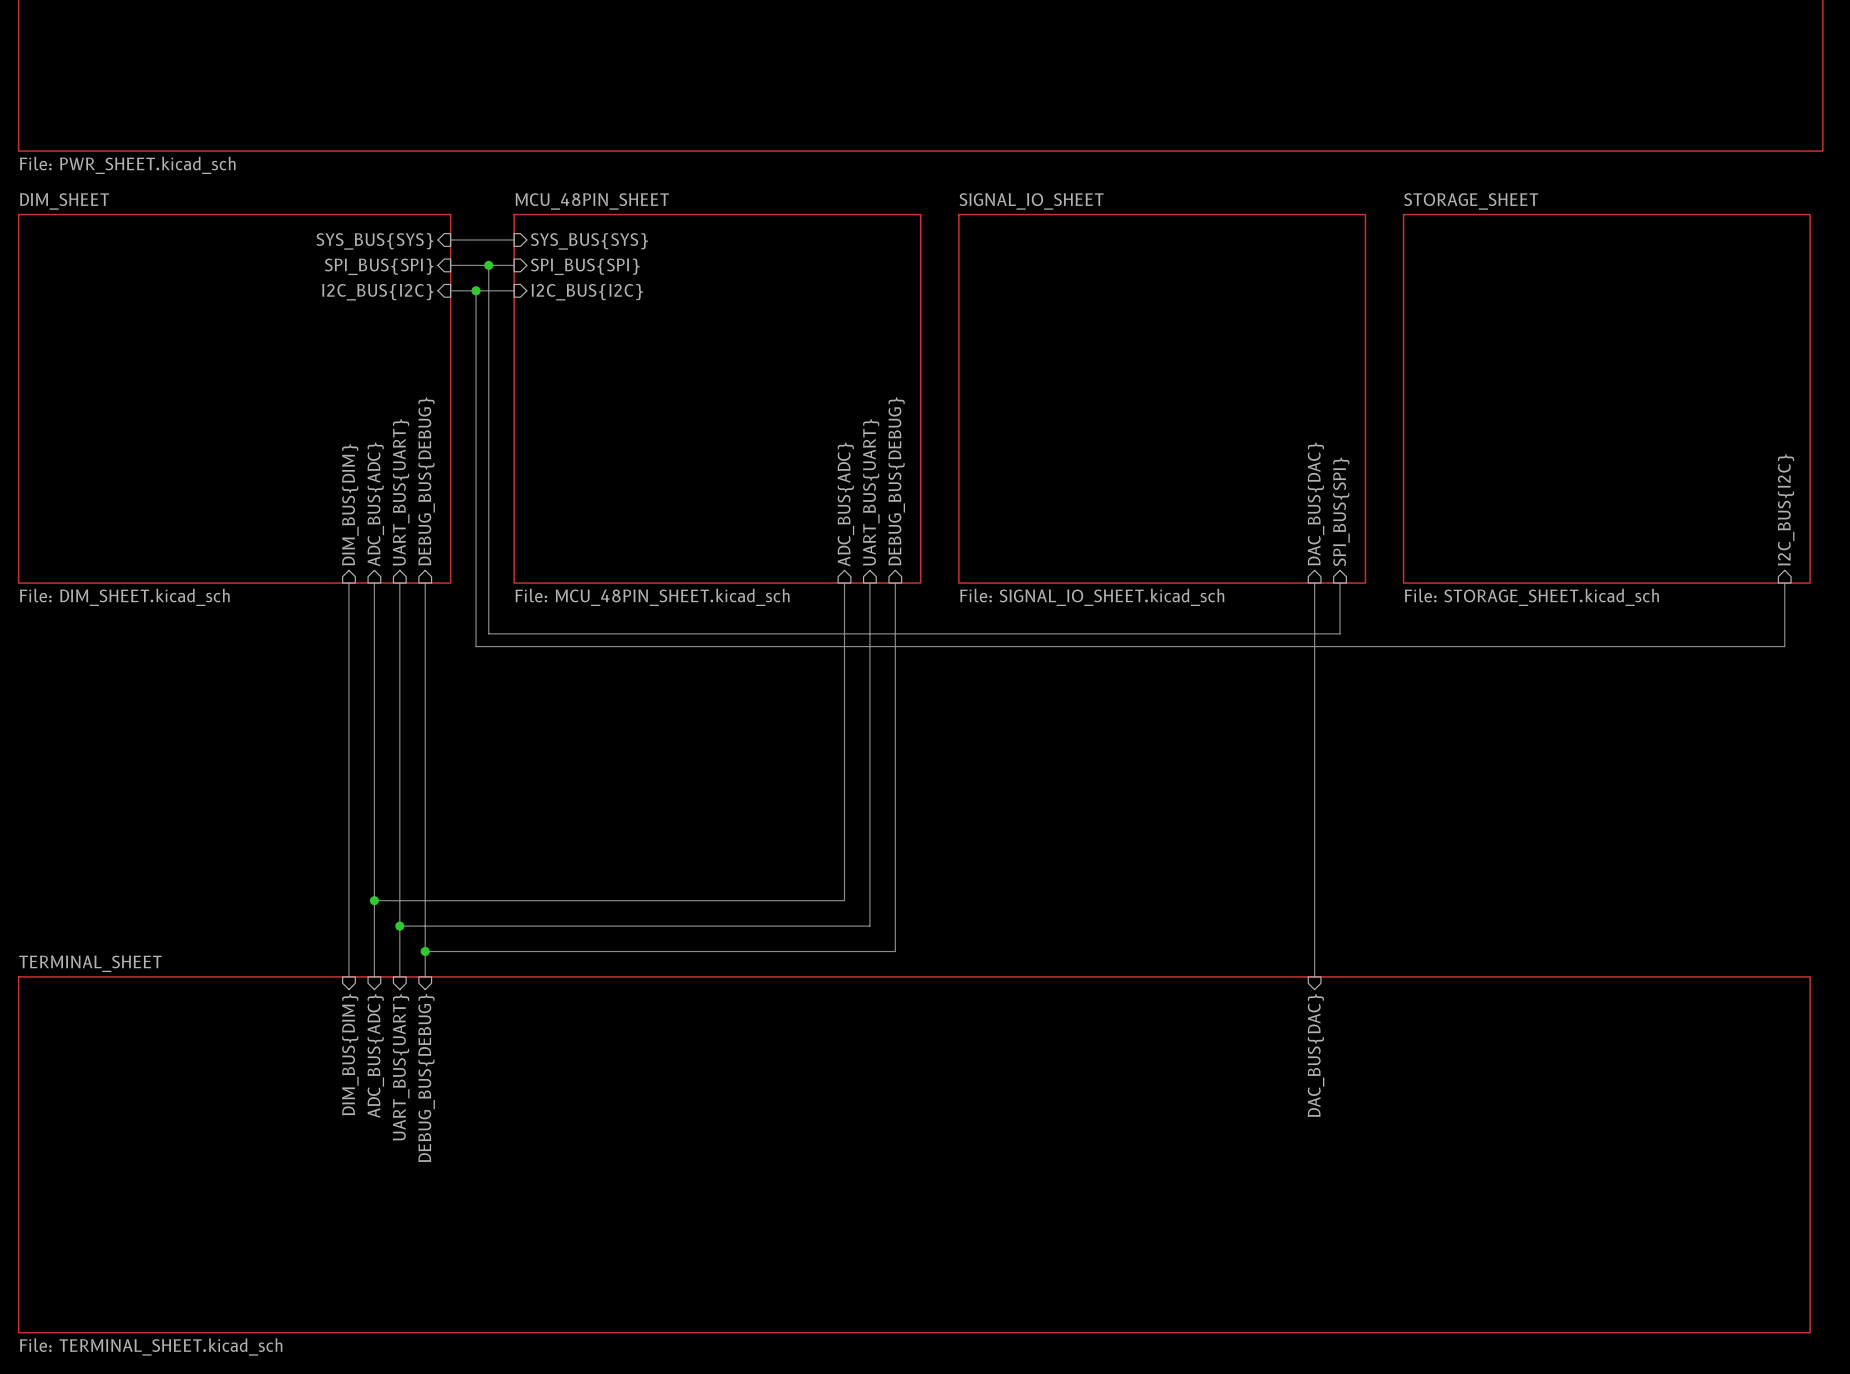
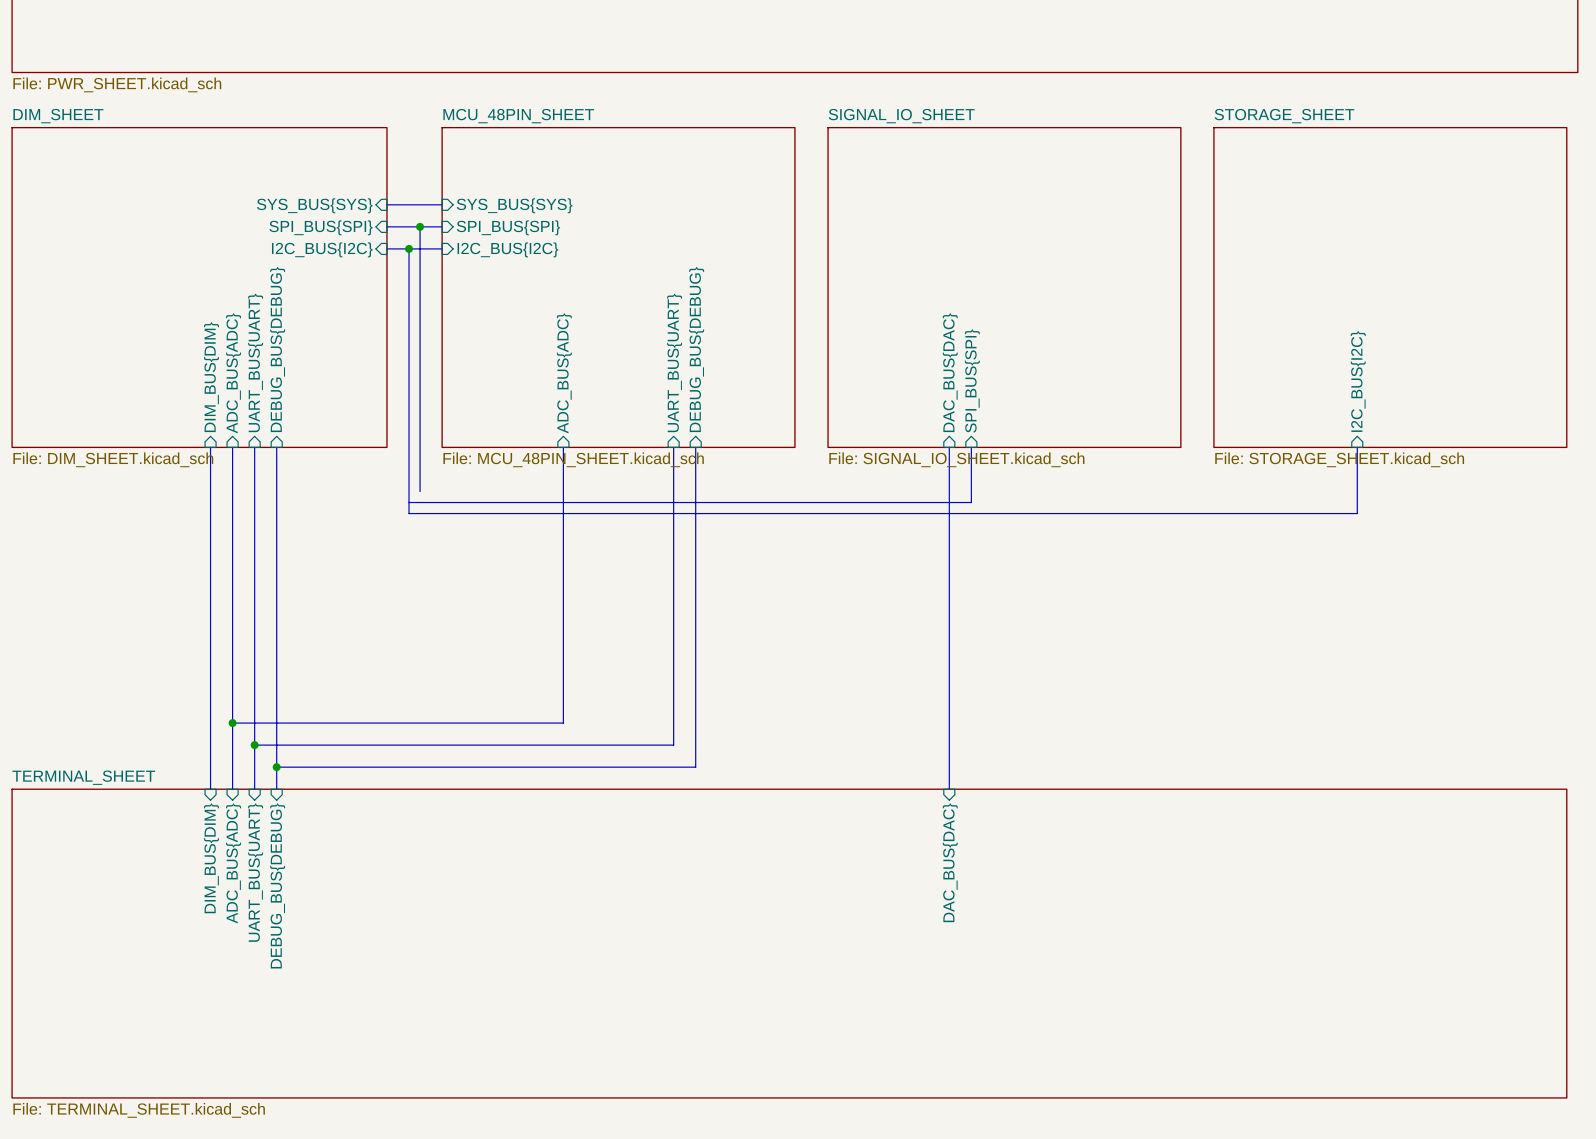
bus: (450, 239) (514, 239) -> (386, 204) (442, 204)
sheet pin: SYS_BUS{SYS} (374, 241) -> none
sheet pin: SYS_BUS{SYS} (589, 241) -> none
bus: (450, 265) (514, 265) -> (386, 226) (442, 226)
bus: (488, 265) (488, 328) -> none
junction: (488, 265) -> none
sheet pin: SPI_BUS{SPI} (379, 266) -> none
sheet pin: SPI_BUS{SPI} (585, 266) -> none
bus: (450, 290) (514, 290) -> (386, 248) (442, 248)
bus: (476, 290) (476, 354) -> none
junction: (476, 290) -> none
sheet pin: I2C_BUS{I2C} (377, 292) -> none
sheet pin: I2C_BUS{I2C} (587, 292) -> none
sheet pin: none -> SYS_BUS{SYS} (314, 205)
sheet pin: none -> SYS_BUS{SYS} (514, 205)
junction: none -> (420, 226)
sheet pin: none -> SPI_BUS{SPI} (321, 227)
sheet pin: none -> SPI_BUS{SPI} (508, 227)
junction: none -> (409, 248)
sheet pin: none -> I2C_BUS{I2C} (322, 249)
sheet pin: none -> I2C_BUS{I2C} (507, 249)
sheet pin position: DEBUG_BUS{DEBUG} (426, 481) -> DEBUG_BUS{DEBUG} (277, 349)
sheet pin position: DEBUG_BUS{DEBUG} (896, 481) -> DEBUG_BUS{DEBUG} (696, 349)
sheet pin position: UART_BUS{UART} (401, 492) -> UART_BUS{UART} (255, 363)
sheet pin position: UART_BUS{UART} (871, 492) -> UART_BUS{UART} (674, 363)
sheet pin position: DIM_BUS{DIM} (350, 504) -> DIM_BUS{DIM} (211, 377)
sheet pin position: ADC_BUS{ADC} (375, 504) -> ADC_BUS{ADC} (233, 373)
sheet pin: none -> ADC_BUS{ADC} (564, 373)
sheet pin: ADC_BUS{ADC} (845, 504) -> none
sheet pin position: DAC_BUS{DAC} (1316, 504) -> DAC_BUS{DAC} (950, 372)
sheet pin position: I2C_BUS{I2C} (1786, 509) -> I2C_BUS{I2C} (1358, 381)
sheet pin position: SPI_BUS{SPI} (1341, 511) -> SPI_BUS{SPI} (972, 381)
bus: (348, 583) (348, 976) -> (210, 447) (210, 789)
bus: (374, 583) (374, 976) -> (232, 447) (232, 789)
bus: (399, 583) (399, 976) -> (254, 447) (254, 789)
bus: (425, 583) (425, 976) -> (276, 447) (276, 789)
bus: (844, 583) (844, 900) (653, 900) -> (563, 447) (563, 723)
bus: (869, 583) (869, 926) (780, 926) -> (673, 447) (673, 745)
bus: (895, 583) (895, 951) (806, 951) -> (695, 447) (695, 767)
bus: (1314, 583) (1314, 976) -> (949, 447) (949, 789)
bus: (1340, 583) (1340, 633) (488, 633) -> none
bus: none -> (1357, 447) (1357, 513) (409, 513) (409, 502)
bus: (1784, 583) (1784, 646) (1124, 646) -> (971, 447) (971, 502)
bus: none -> (232, 723) (320, 723)
junction: none -> (232, 723)
junction: (374, 900) -> none
bus: none -> (254, 745) (342, 745)
junction: none -> (254, 745)
junction: (399, 926) -> none
bus: none -> (276, 767) (364, 767)
junction: none -> (276, 767)
junction: (425, 951) -> none
sheet pin position: DIM_BUS{DIM} (350, 1054) -> DIM_BUS{DIM} (211, 858)
sheet pin position: DAC_BUS{DAC} (1316, 1055) -> DAC_BUS{DAC} (950, 862)
sheet pin position: ADC_BUS{ADC} (375, 1056) -> ADC_BUS{ADC} (233, 863)
sheet pin position: UART_BUS{UART} (401, 1067) -> UART_BUS{UART} (255, 872)
sheet pin position: DEBUG_BUS{DEBUG} (426, 1078) -> DEBUG_BUS{DEBUG} (277, 885)

